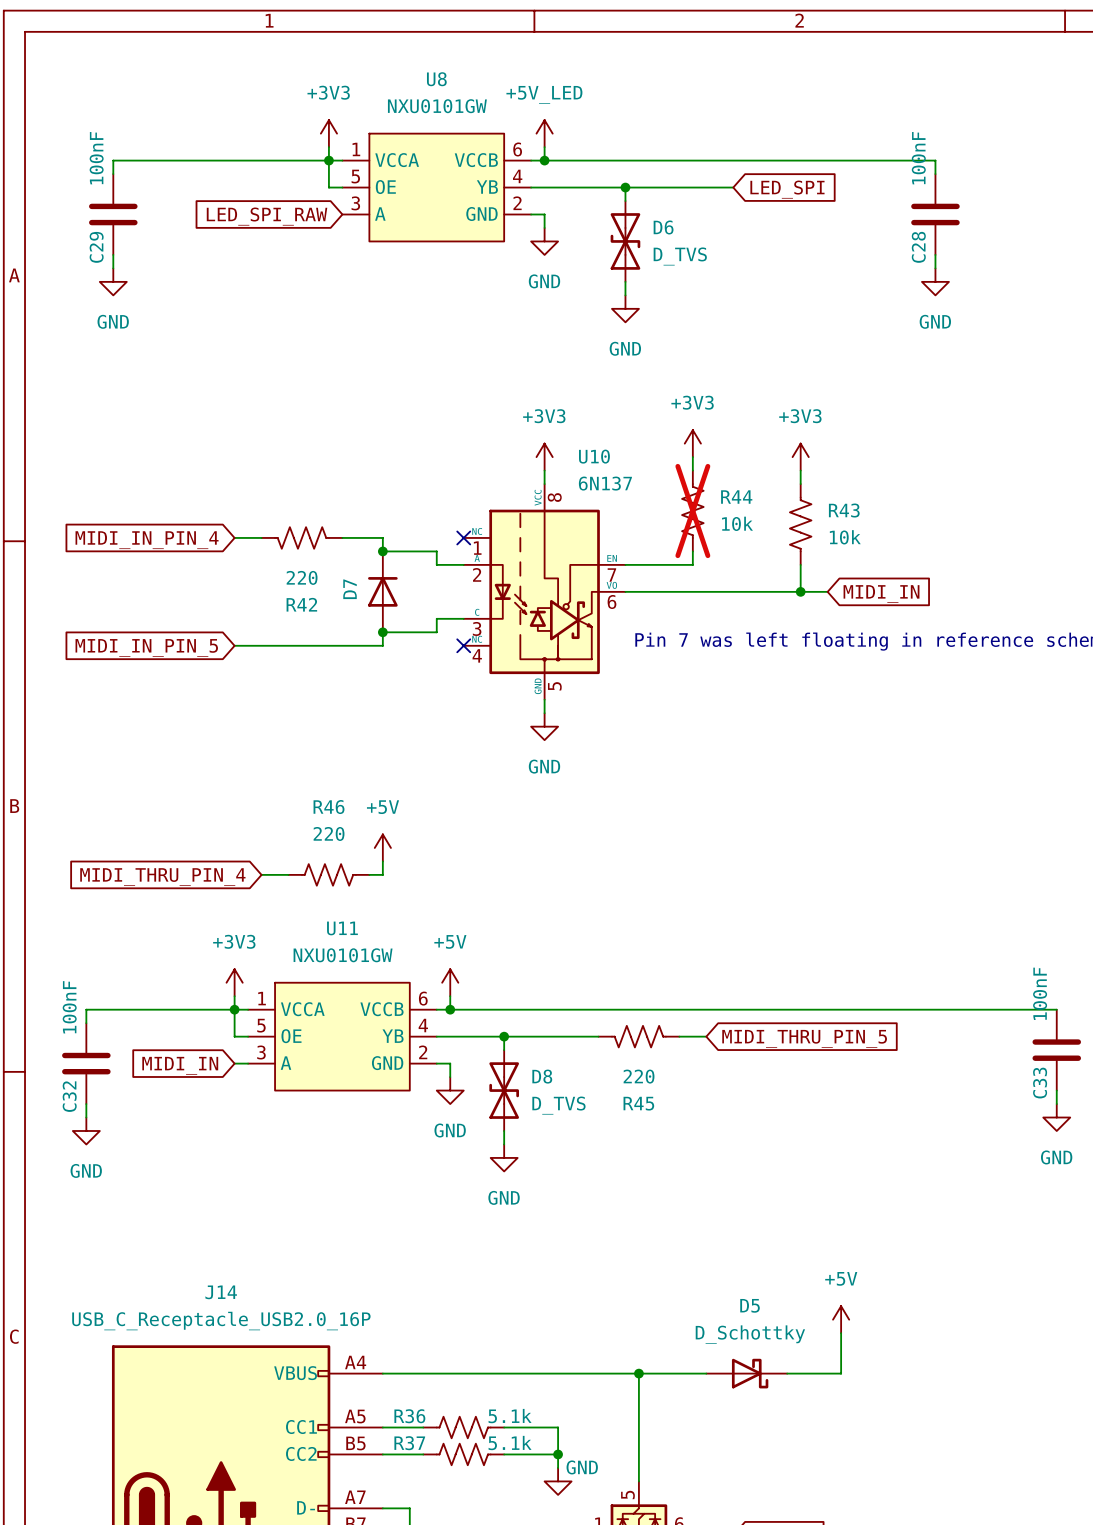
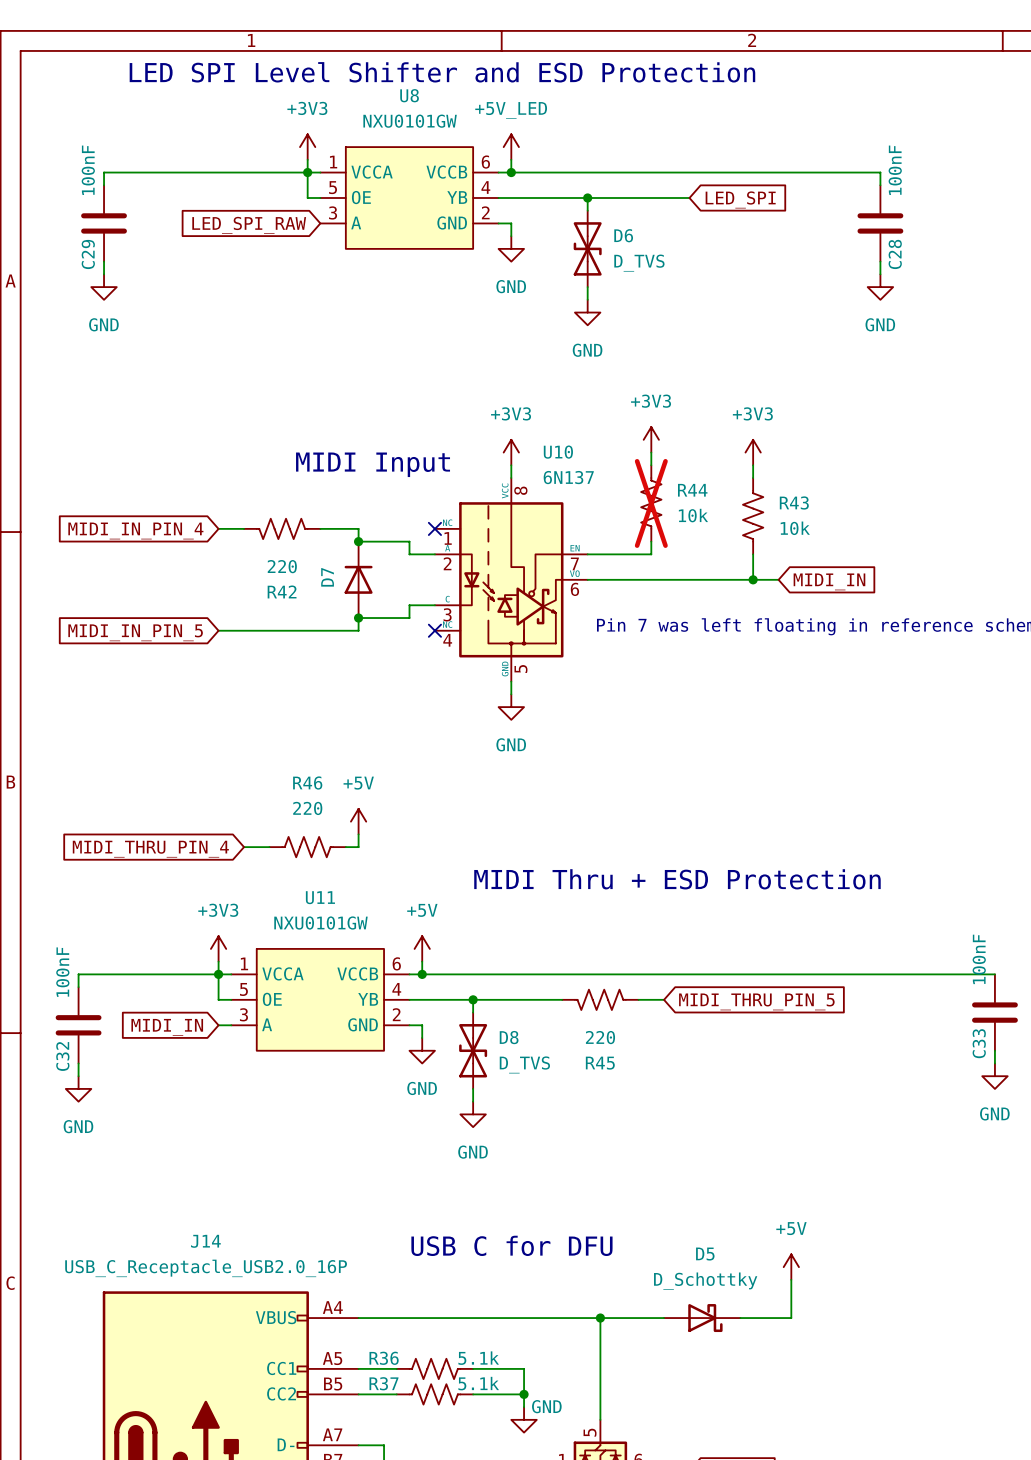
text: none -> LED SPI Level Shifter and ESD Protection (442, 72)
C28 value position: 100nF (918, 158) -> 100nF (895, 170)
C28 name position: C28 (918, 247) -> C28 (895, 254)
text: none -> MIDI Input (373, 464)
text: none -> MIDI Thru + ESD Protection (677, 879)
text: none -> USB C for DFU (511, 1245)

